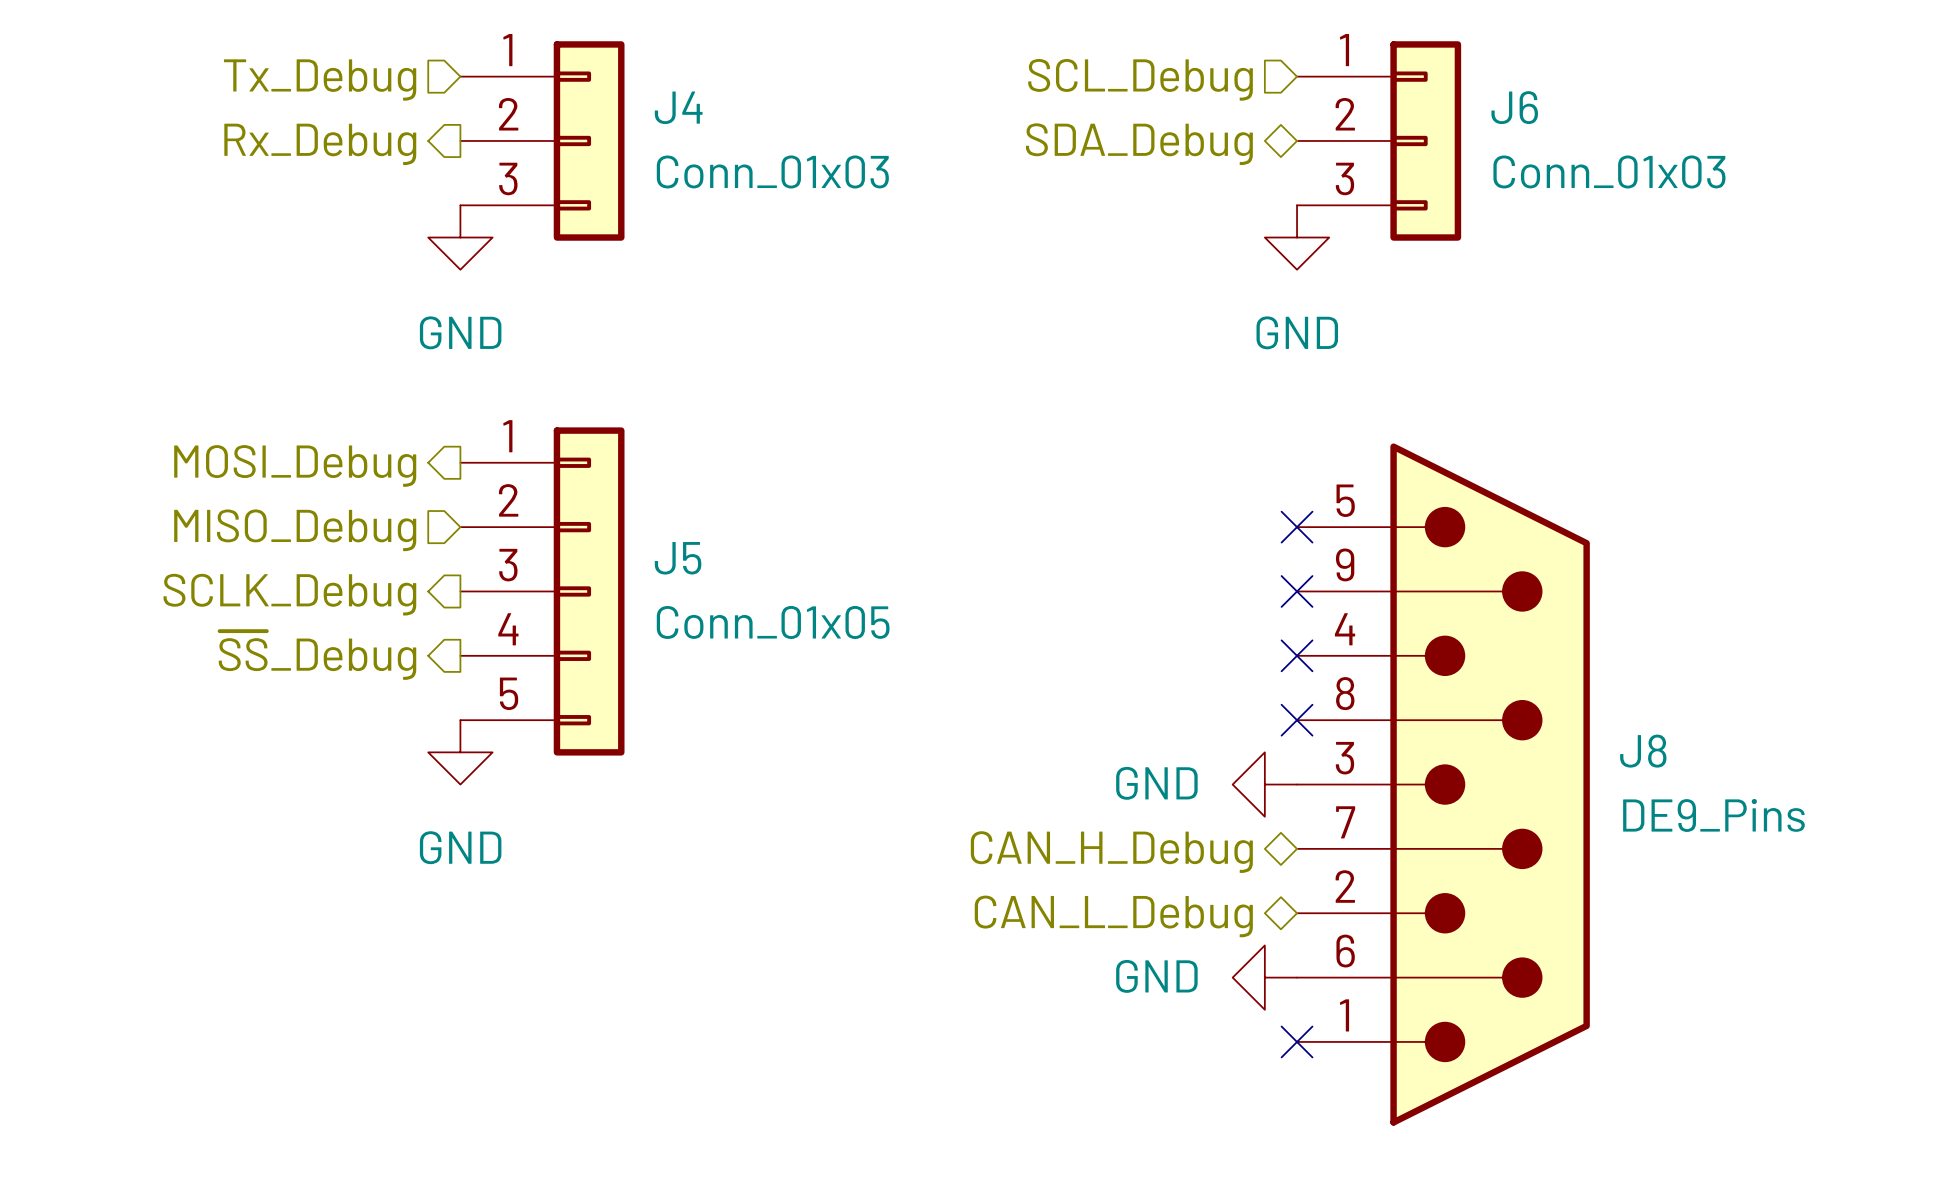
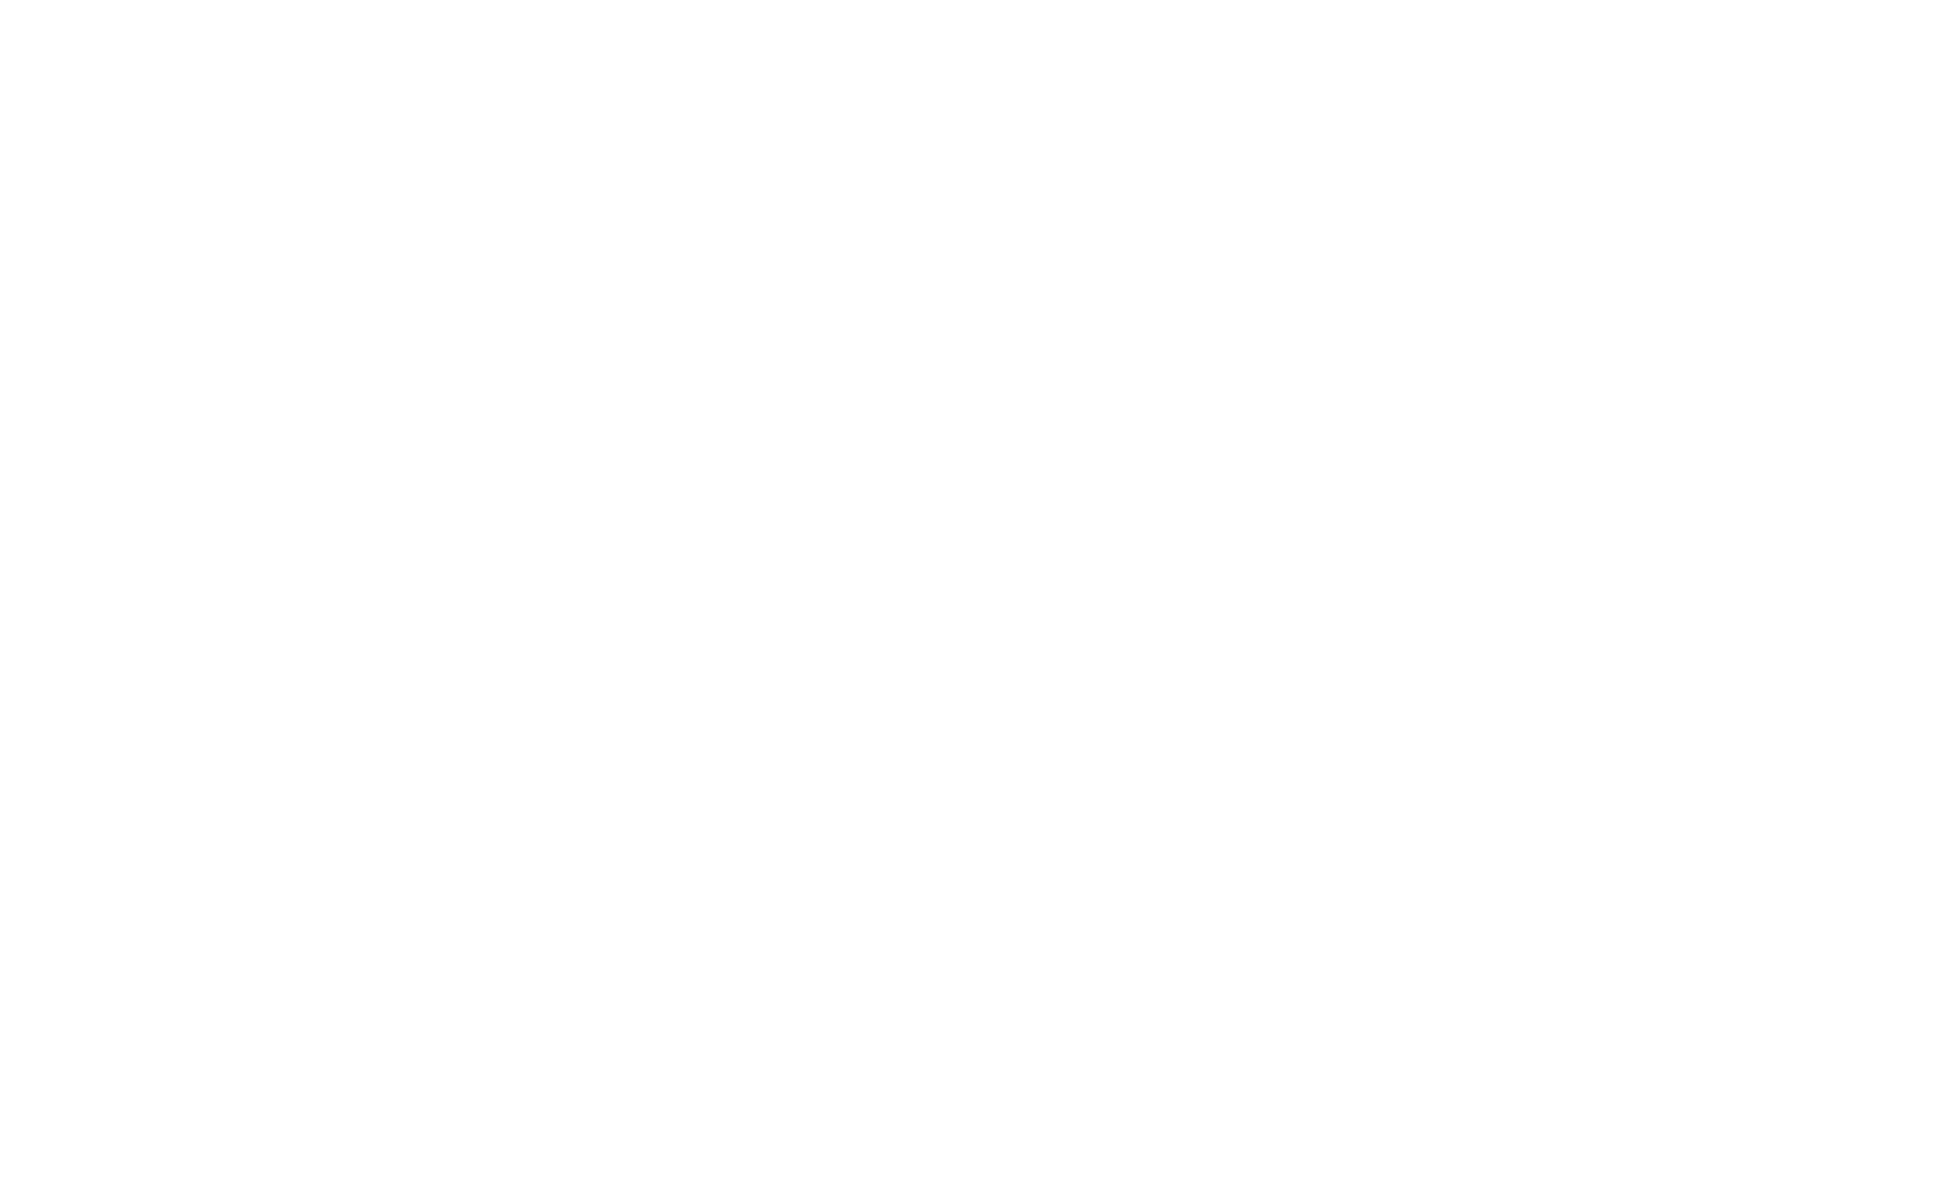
hierarchical label: SCL_Debug (1140, 79) -> none
hierarchical label: Tx_Debug (320, 80) -> none
J4: Conn_01x03 (542, 140) -> none
J6: Conn_01x03 (1379, 140) -> none
hierarchical label: Rx_Debug (320, 144) -> none
hierarchical label: SDA_Debug (1139, 144) -> none
power symbol: GND (460, 237) -> none
power symbol: GND (1297, 237) -> none
hierarchical label: MOSI_Debug (295, 465) -> none
no-connect mark: (1297, 527) -> none
hierarchical label: MISO_Debug (295, 530) -> none
J5: Conn_01x05 (542, 591) -> none
no-connect mark: (1297, 591) -> none
hierarchical label: SCLK_Debug (289, 594) -> none
hierarchical label: ~{SS}_Debug (317, 655) -> none
no-connect mark: (1297, 655) -> none
no-connect mark: (1297, 720) -> none
power symbol: GND (460, 752) -> none
power symbol: GND (1264, 784) -> none
J8: DE9_Pins (1443, 784) -> none
hierarchical label: CAN_H_Debug (1111, 852) -> none
hierarchical label: CAN_L_Debug (1113, 916) -> none
power symbol: GND (1264, 977) -> none
no-connect mark: (1297, 1041) -> none

